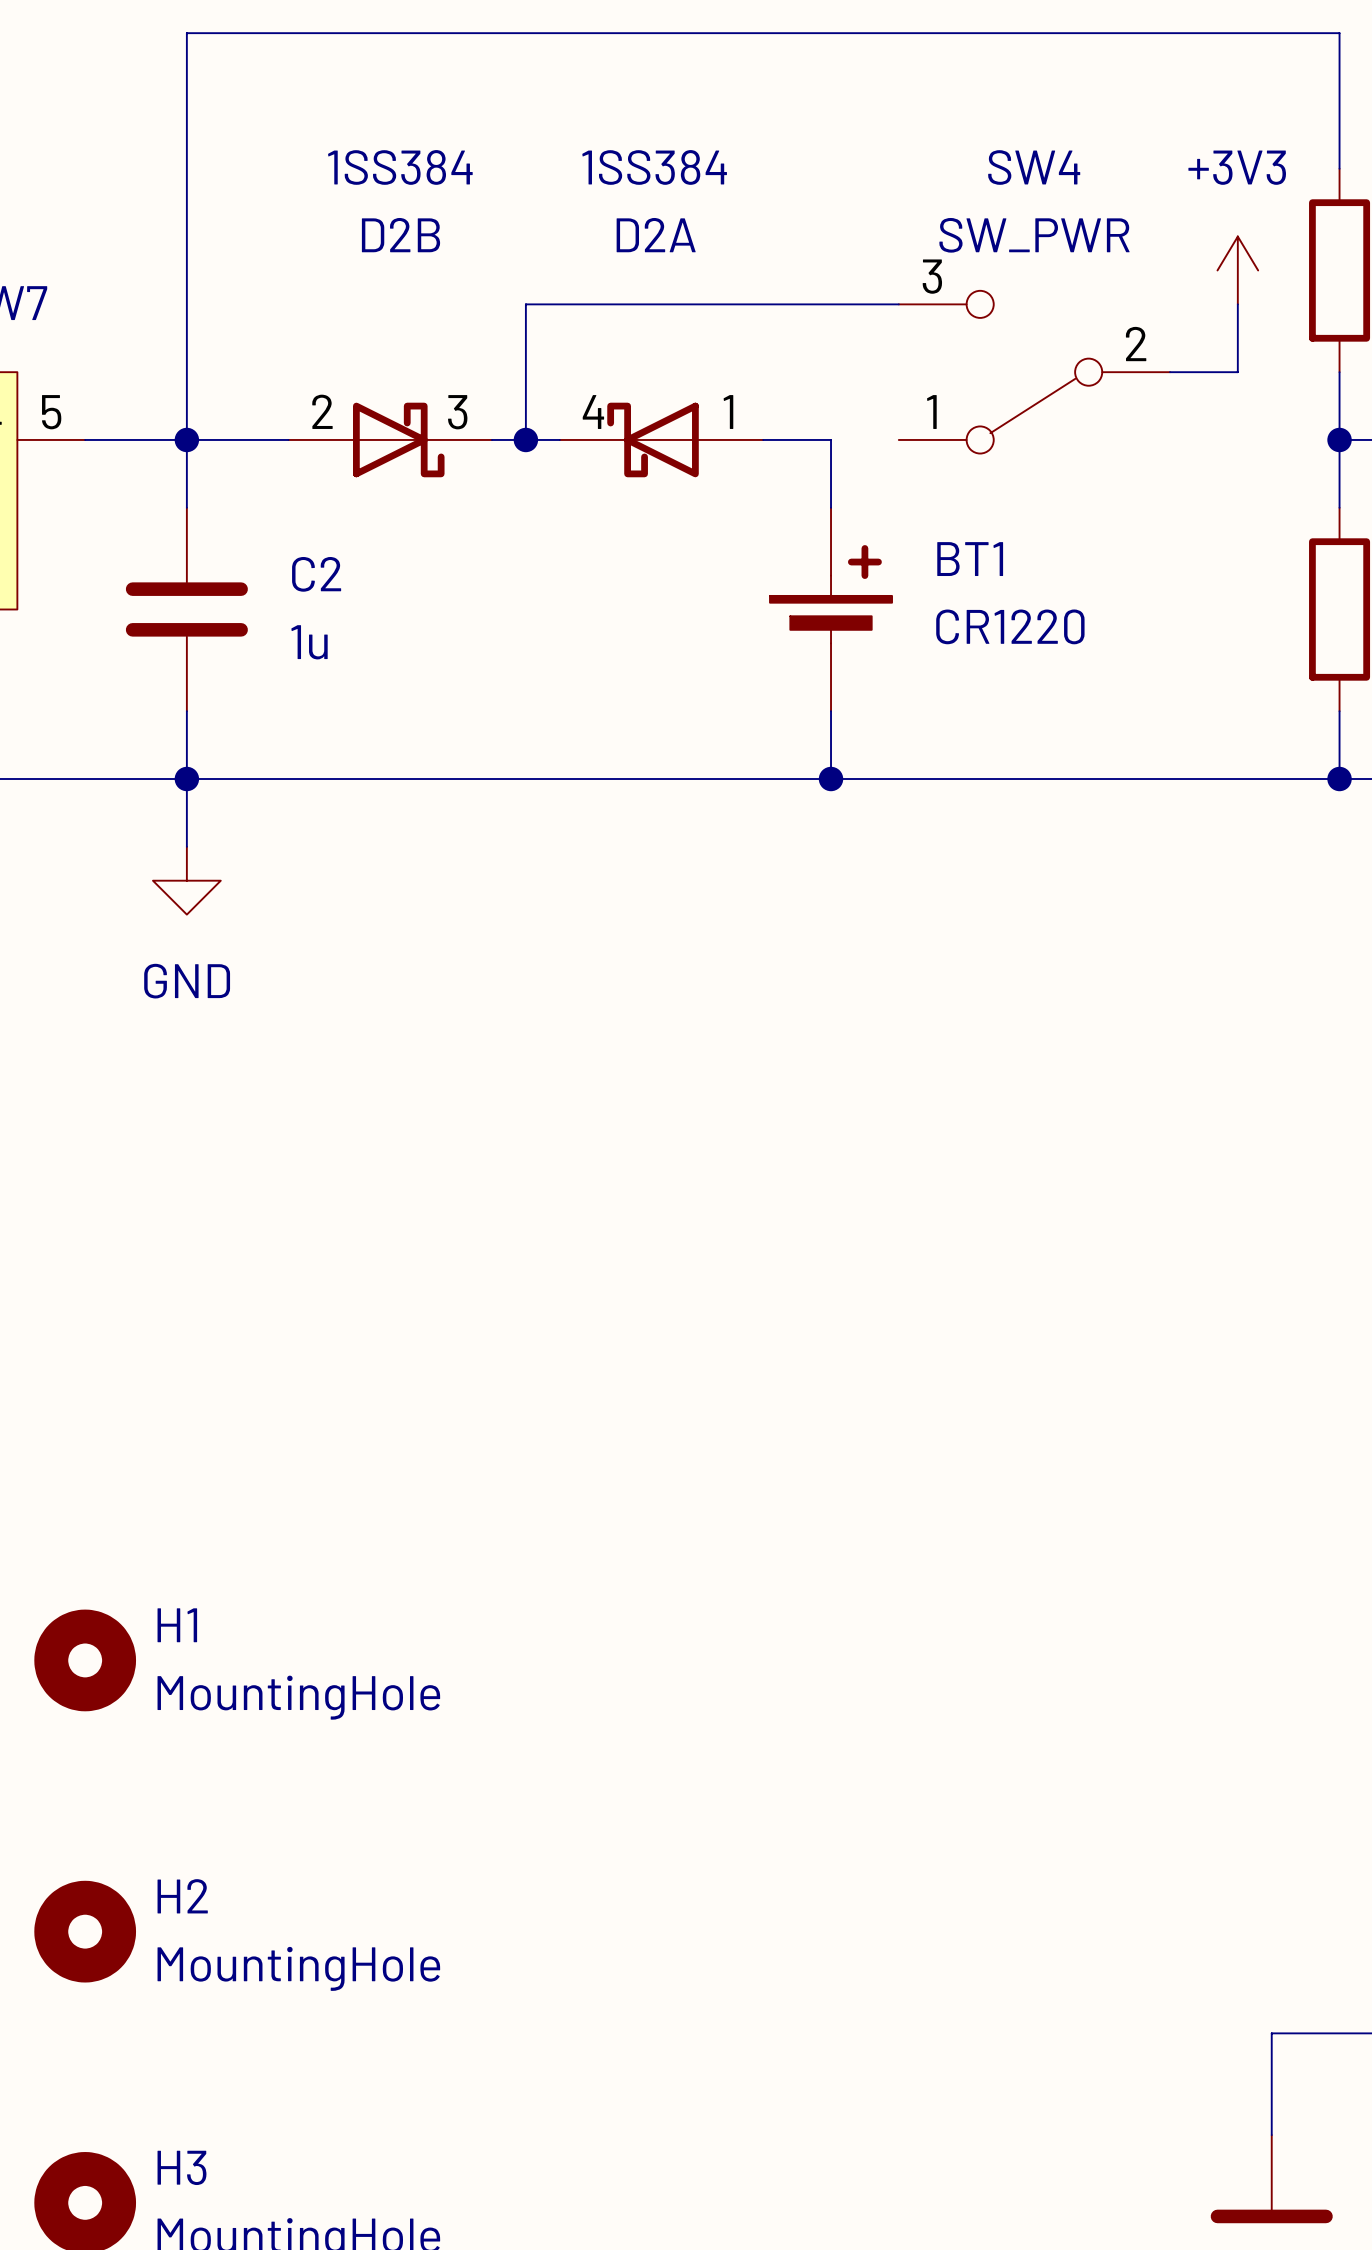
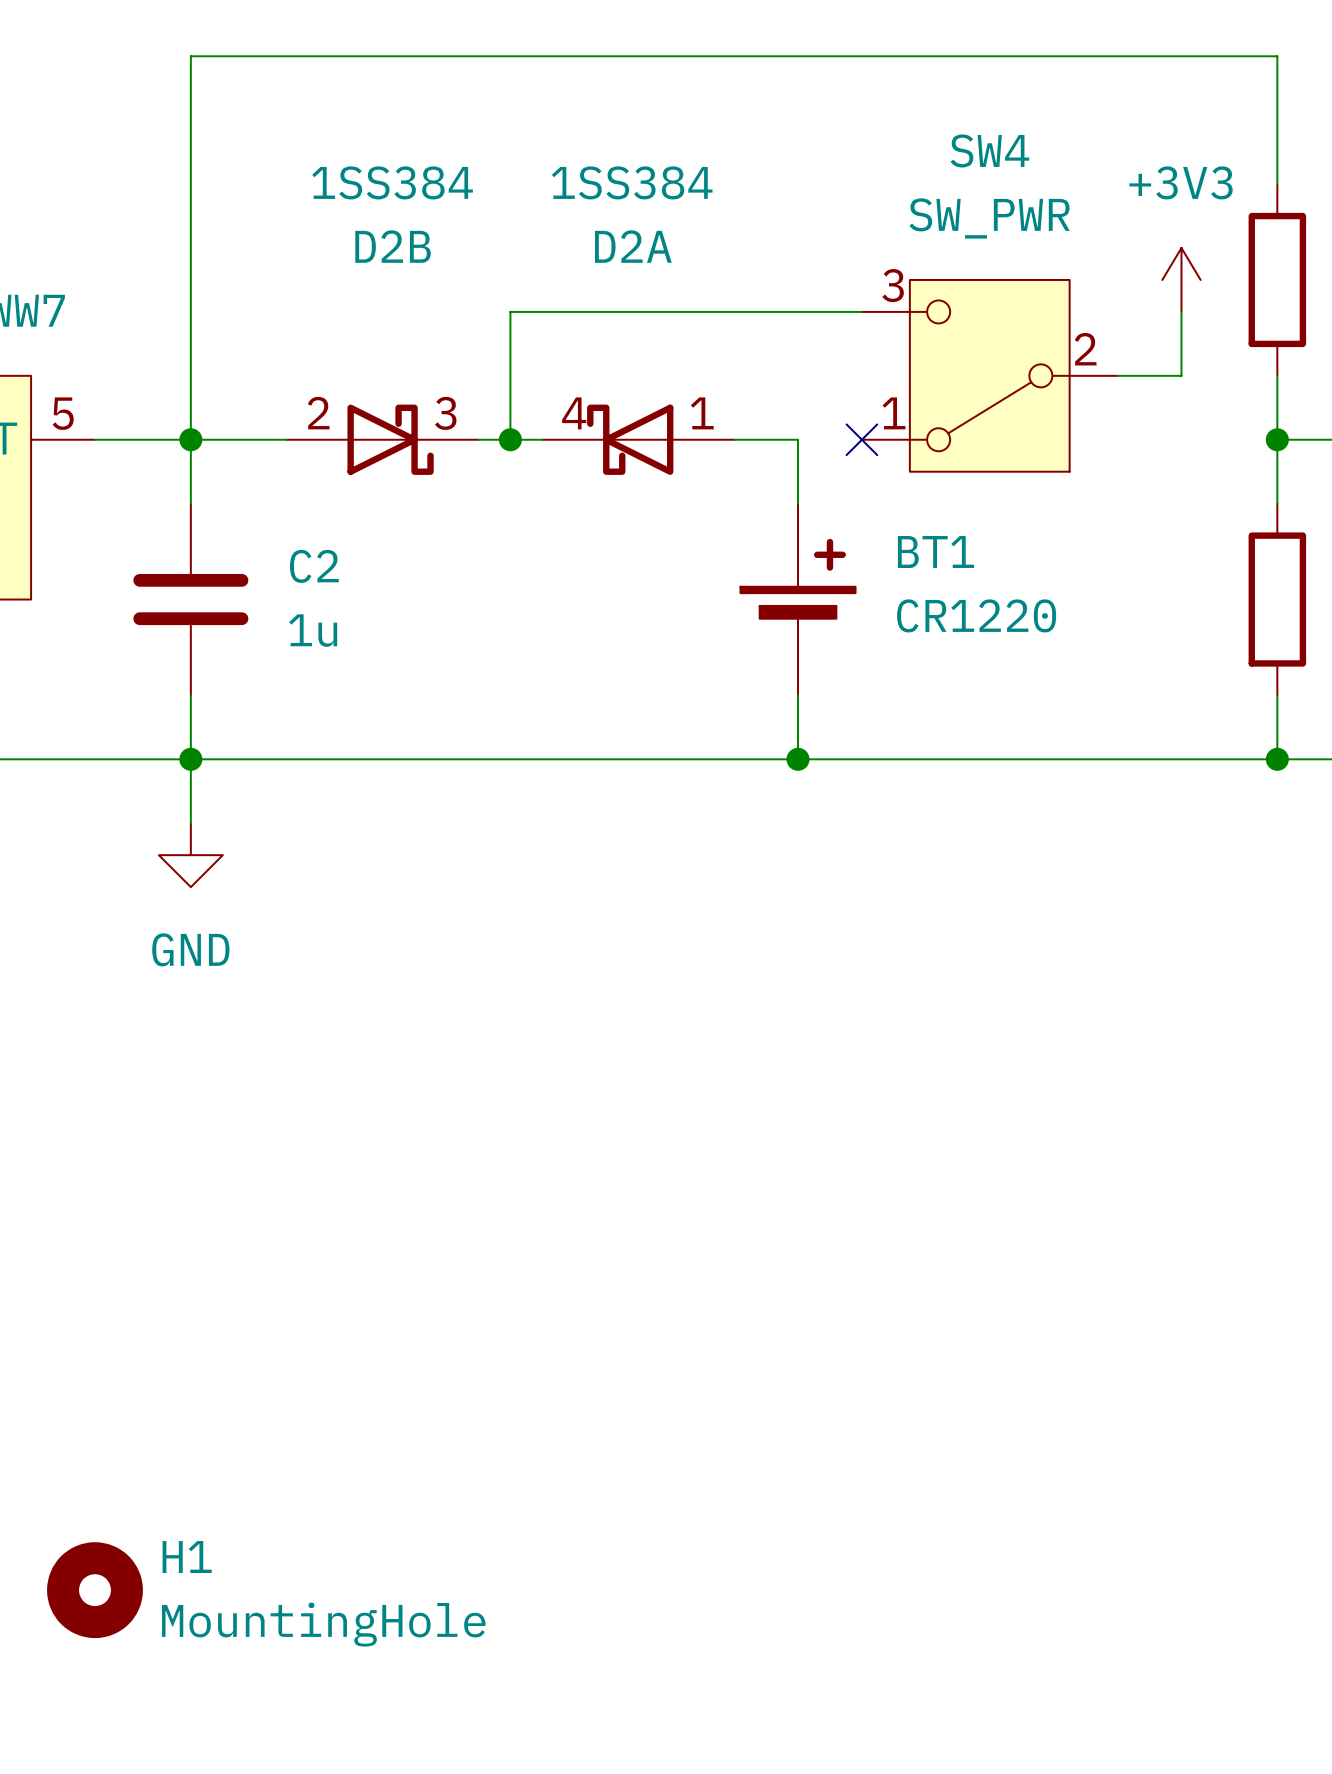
SW4 symbol: [898, 290, 1171, 454] -> [861, 279, 1118, 472]
no-connect mark: none -> (861, 439)

